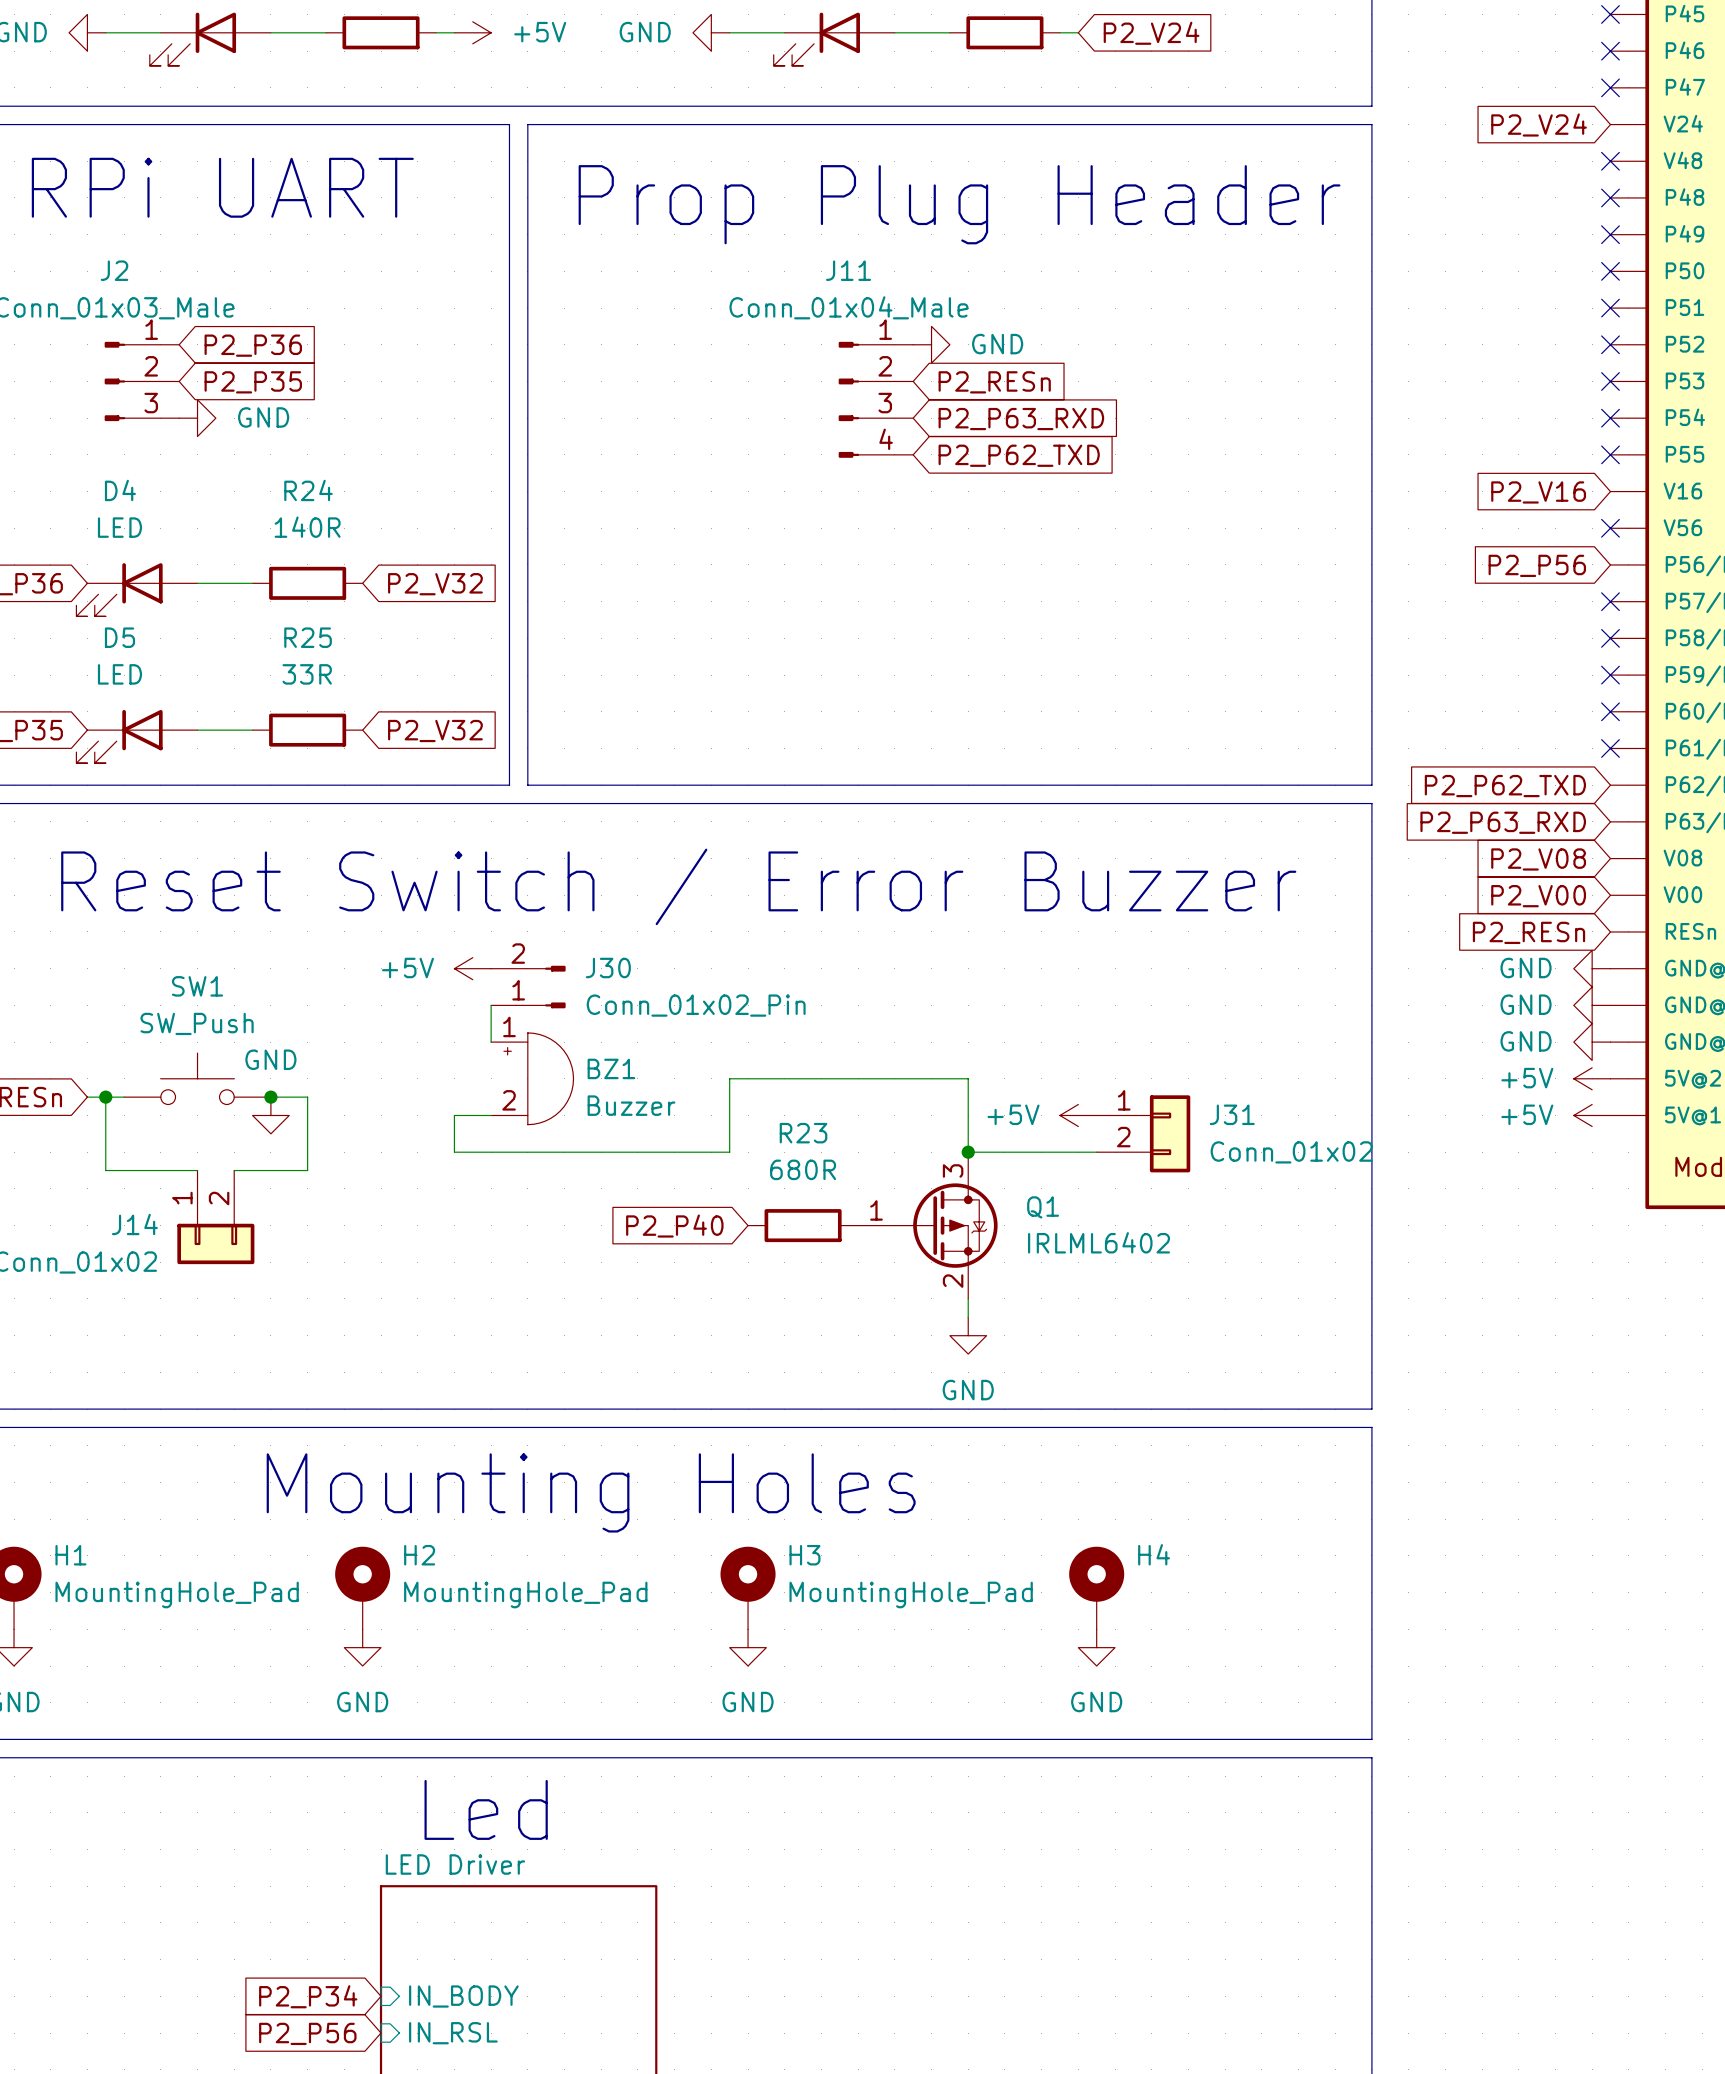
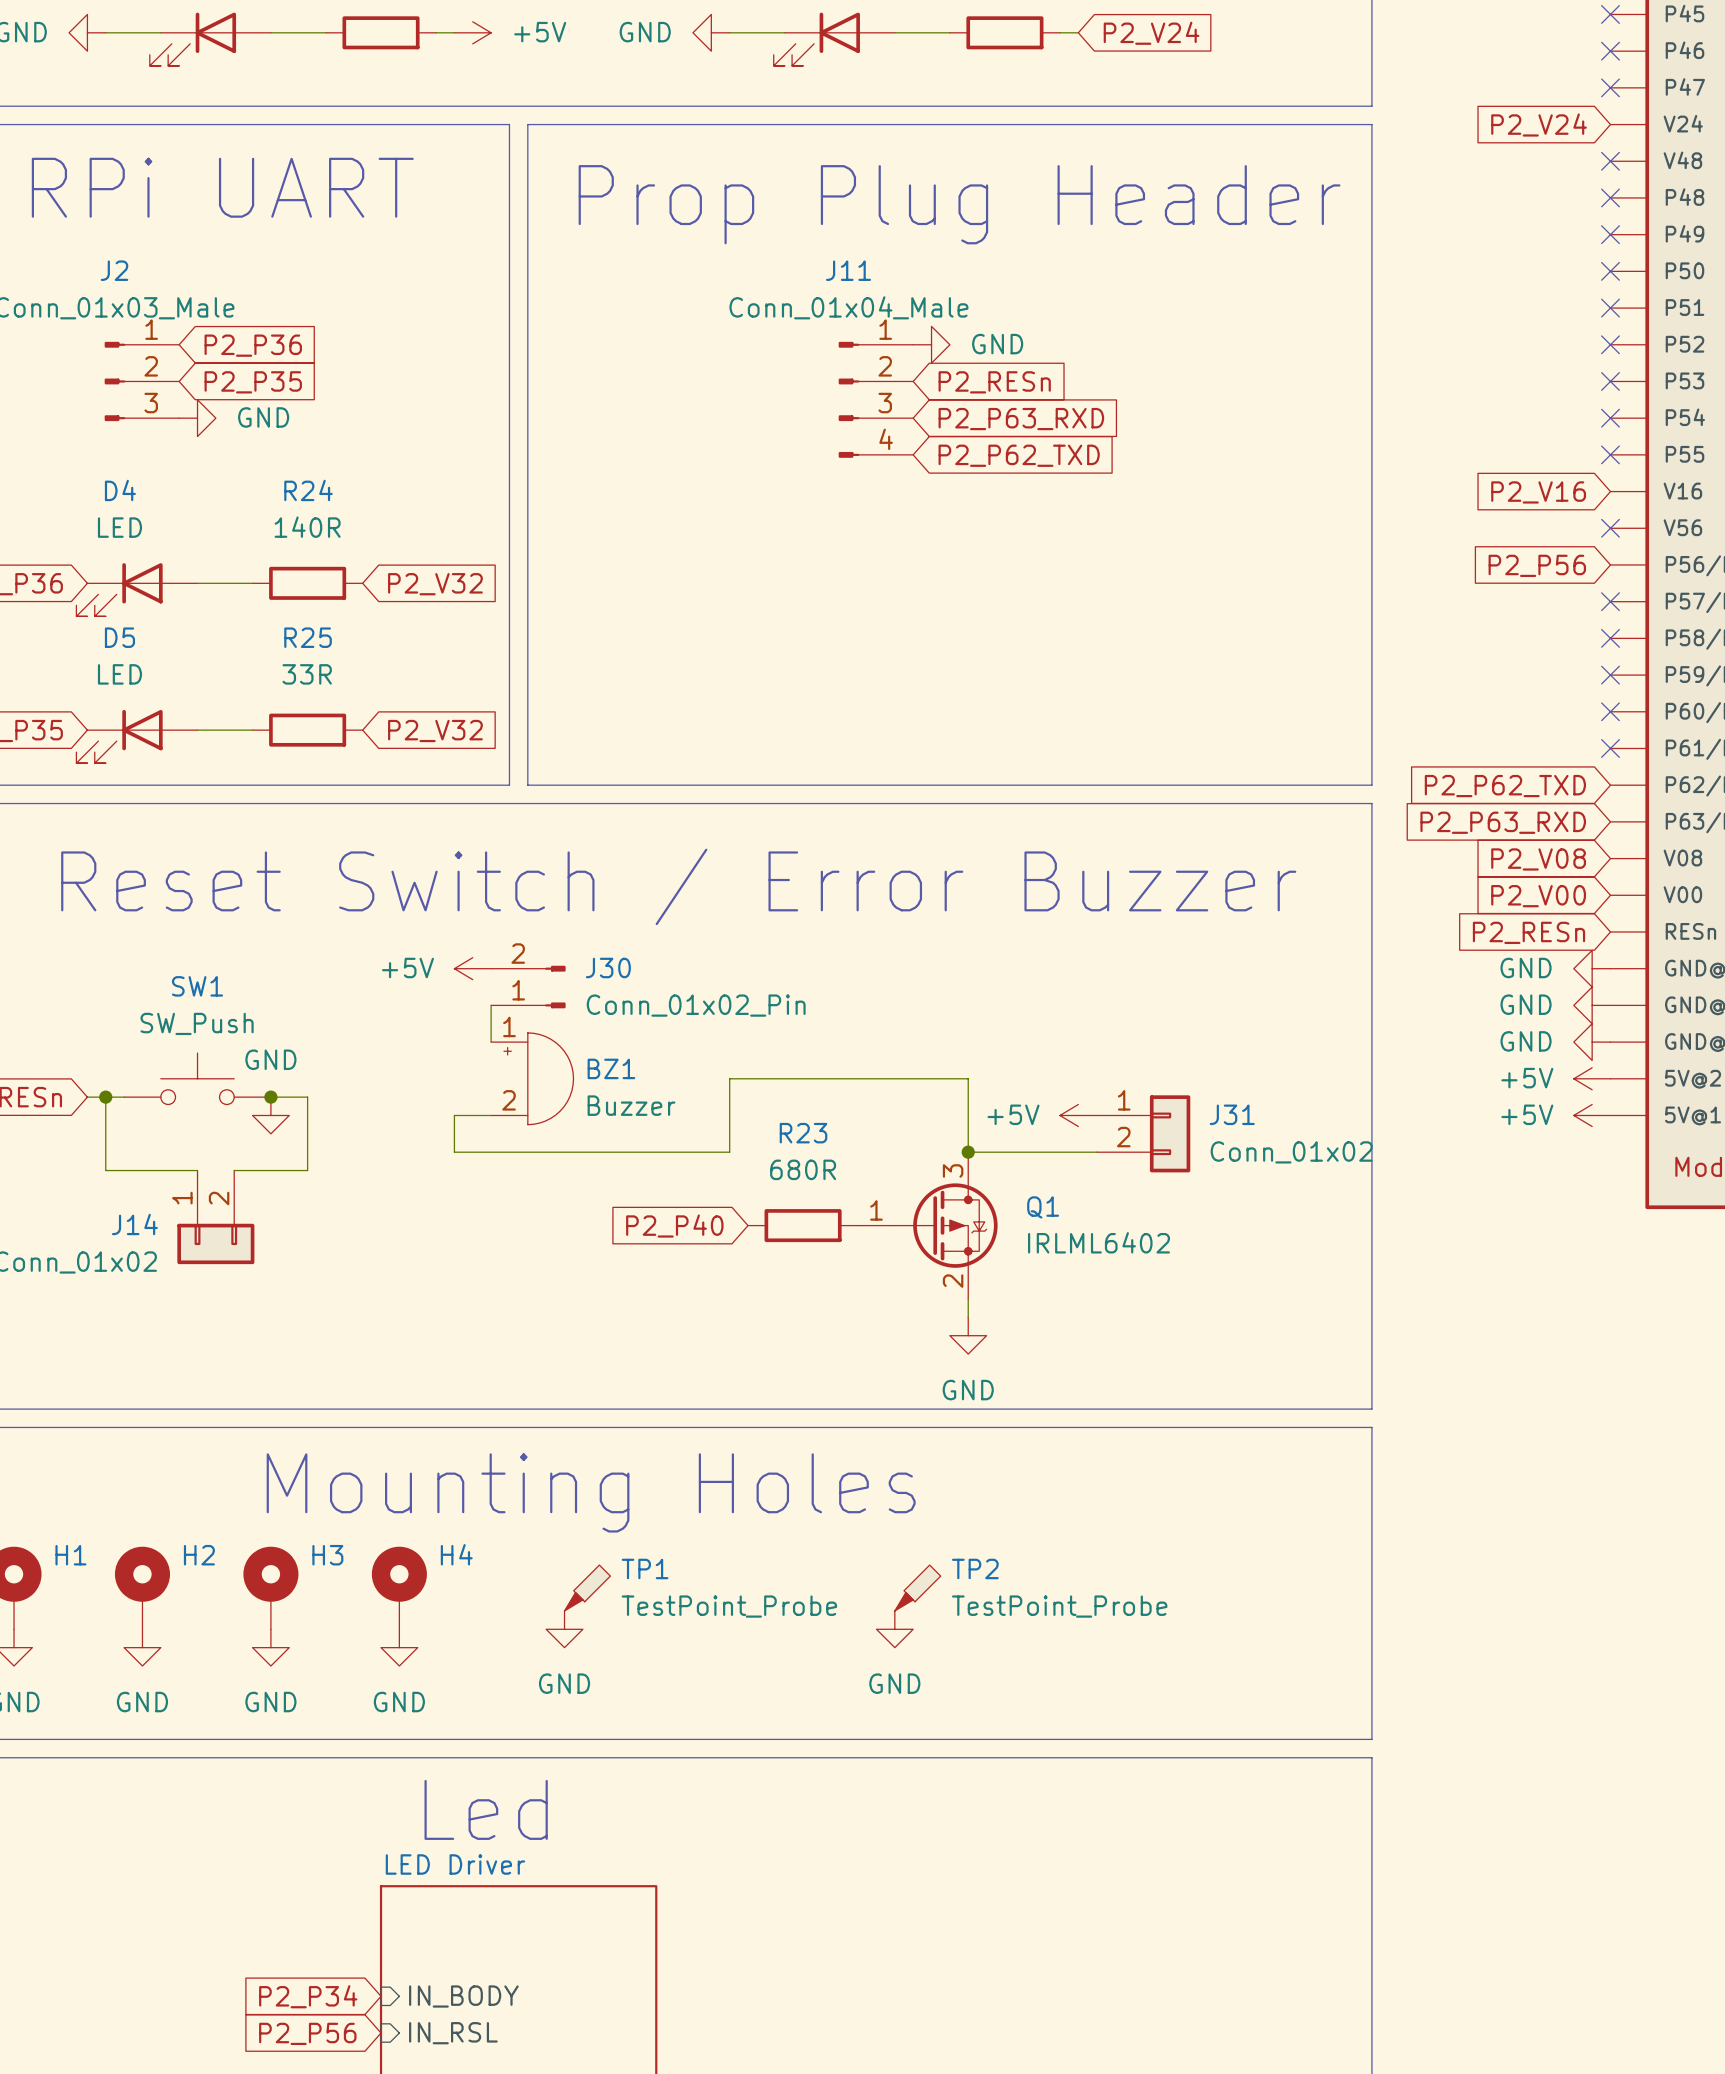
H2 position: (362, 1588) -> (142, 1588)
TP1: none -> TestPoint_Probe (587, 1588)
H3 position: (748, 1588) -> (270, 1588)
TP2: none -> TestPoint_Probe (917, 1588)
H4 position: (1096, 1588) -> (399, 1588)
H1 value: MountingHole_Pad (177, 1594) -> none
H2 value: MountingHole_Pad (525, 1594) -> none
H3 value: MountingHole_Pad (911, 1594) -> none
power symbol: none -> GND (564, 1629)
power symbol: none -> GND (894, 1629)
power symbol: none -> GND (142, 1647)
power symbol: none -> GND (270, 1647)
power symbol position: GND (362, 1647) -> GND (399, 1647)
power symbol: GND (748, 1647) -> none
power symbol: GND (1096, 1647) -> none

